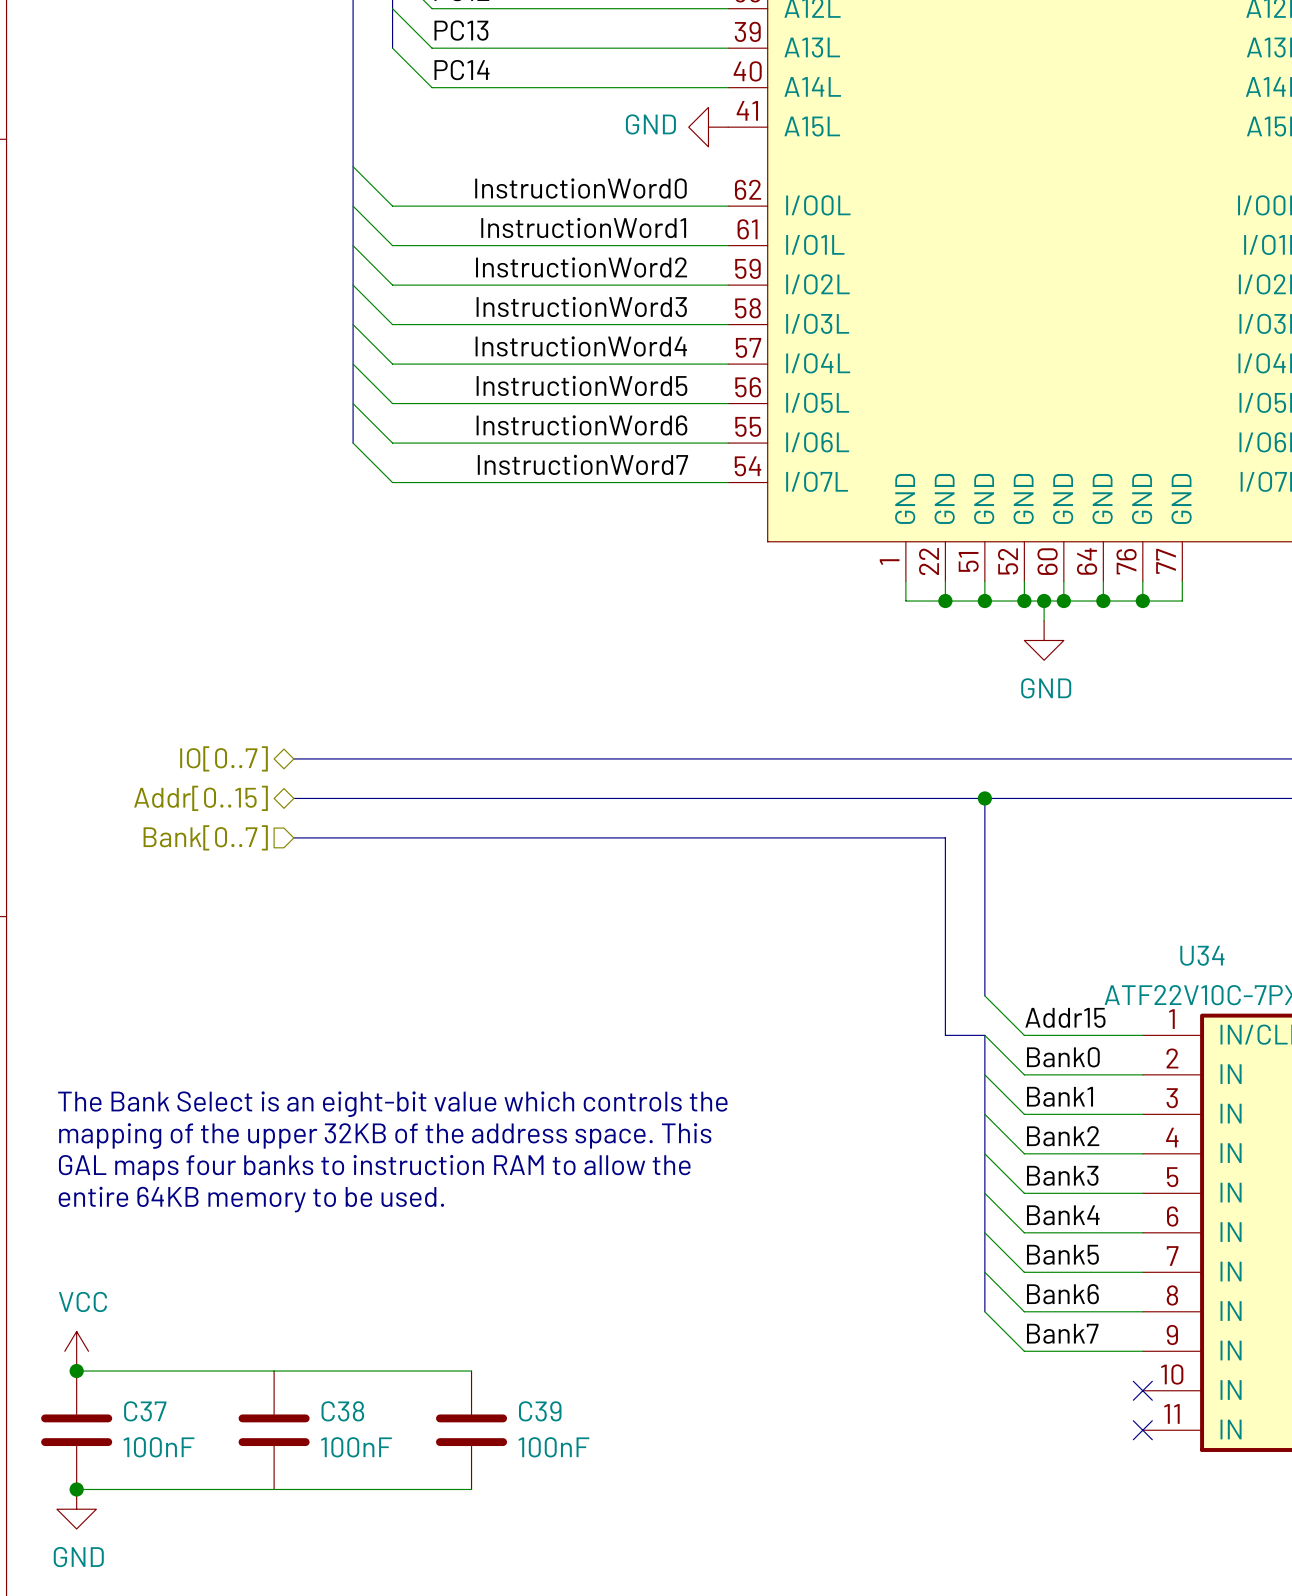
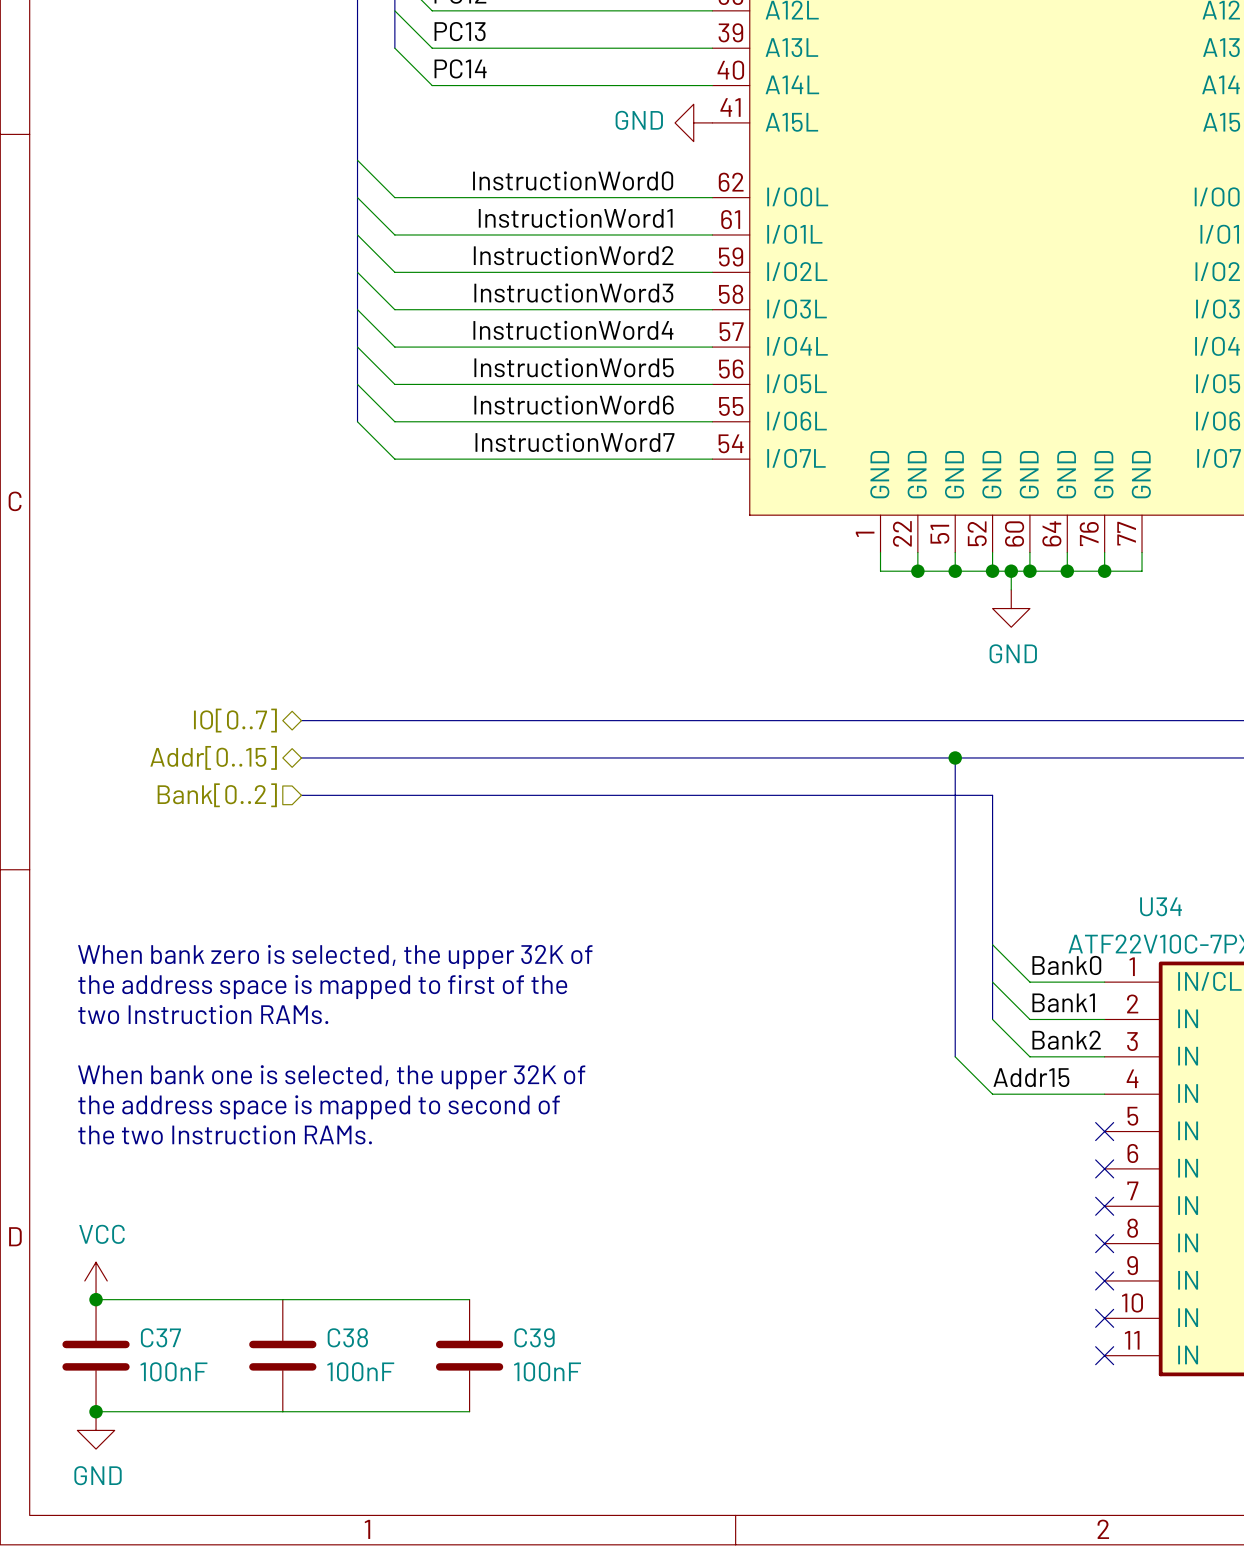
hierarchical label: Bank[0..7] (205, 837) -> Bank[0..2] (217, 795)
bus: (945, 837) (945, 1035) (984, 1035) -> (917, 795) (992, 795) (992, 1019)
wire: (984, 995) (1024, 1035) (1063, 1035) -> (992, 944) (1029, 982)
bus: none -> (955, 944) (955, 982)
text: none -> When bank zero is selected, the upper 32K of (335, 956)
label: Addr15 (1065, 1017) -> none
wire: (984, 1035) (1024, 1074) (1063, 1074) -> (992, 982) (1029, 1019)
text: none -> the address space is mapped to first of the (322, 987)
label position: Bank0 (1063, 1057) -> Bank0 (1066, 965)
text: none -> two Instruction RAMs. (203, 1014)
wire: (984, 1074) (1024, 1114) (1063, 1114) -> (992, 1019) (1029, 1056)
label position: Bank1 (1060, 1096) -> Bank1 (1063, 1002)
label: none -> Bank2 (1066, 1040)
text: The Bank Select is an eight-bit value which controls the (392, 1104) -> none
bus: (984, 1114) (984, 1311) -> none
text: mapping of the upper 32KB of the address space. This (385, 1135) -> When bank one is selected, the upper 32K of (331, 1077)
label: Bank2 (1063, 1136) -> Addr15 (1031, 1077)
wire: (984, 1153) (1024, 1193) (1142, 1193) -> none
text: GAL maps four banks to instruction RAM to allow the (374, 1167) -> the address space is mapped to second of (319, 1107)
label: Bank3 (1062, 1175) -> none
wire: (984, 1193) (1024, 1232) (1142, 1232) -> none
no-connect mark: none -> (1104, 1131)
text: entire 64KB memory to be used. (251, 1199) -> the two Instruction RAMs. (225, 1134)
label: Bank4 (1063, 1215) -> none
wire: (984, 1232) (1024, 1272) (1142, 1272) -> none
no-connect mark: none -> (1104, 1168)
label: Bank5 (1062, 1254) -> none
wire: (984, 1272) (1024, 1311) (1142, 1311) -> none
no-connect mark: none -> (1104, 1206)
label: Bank6 (1062, 1294) -> none
wire: (984, 1311) (1024, 1351) (1142, 1351) -> none
no-connect mark: none -> (1104, 1243)
label: Bank7 (1062, 1333) -> none
no-connect mark: none -> (1104, 1280)

